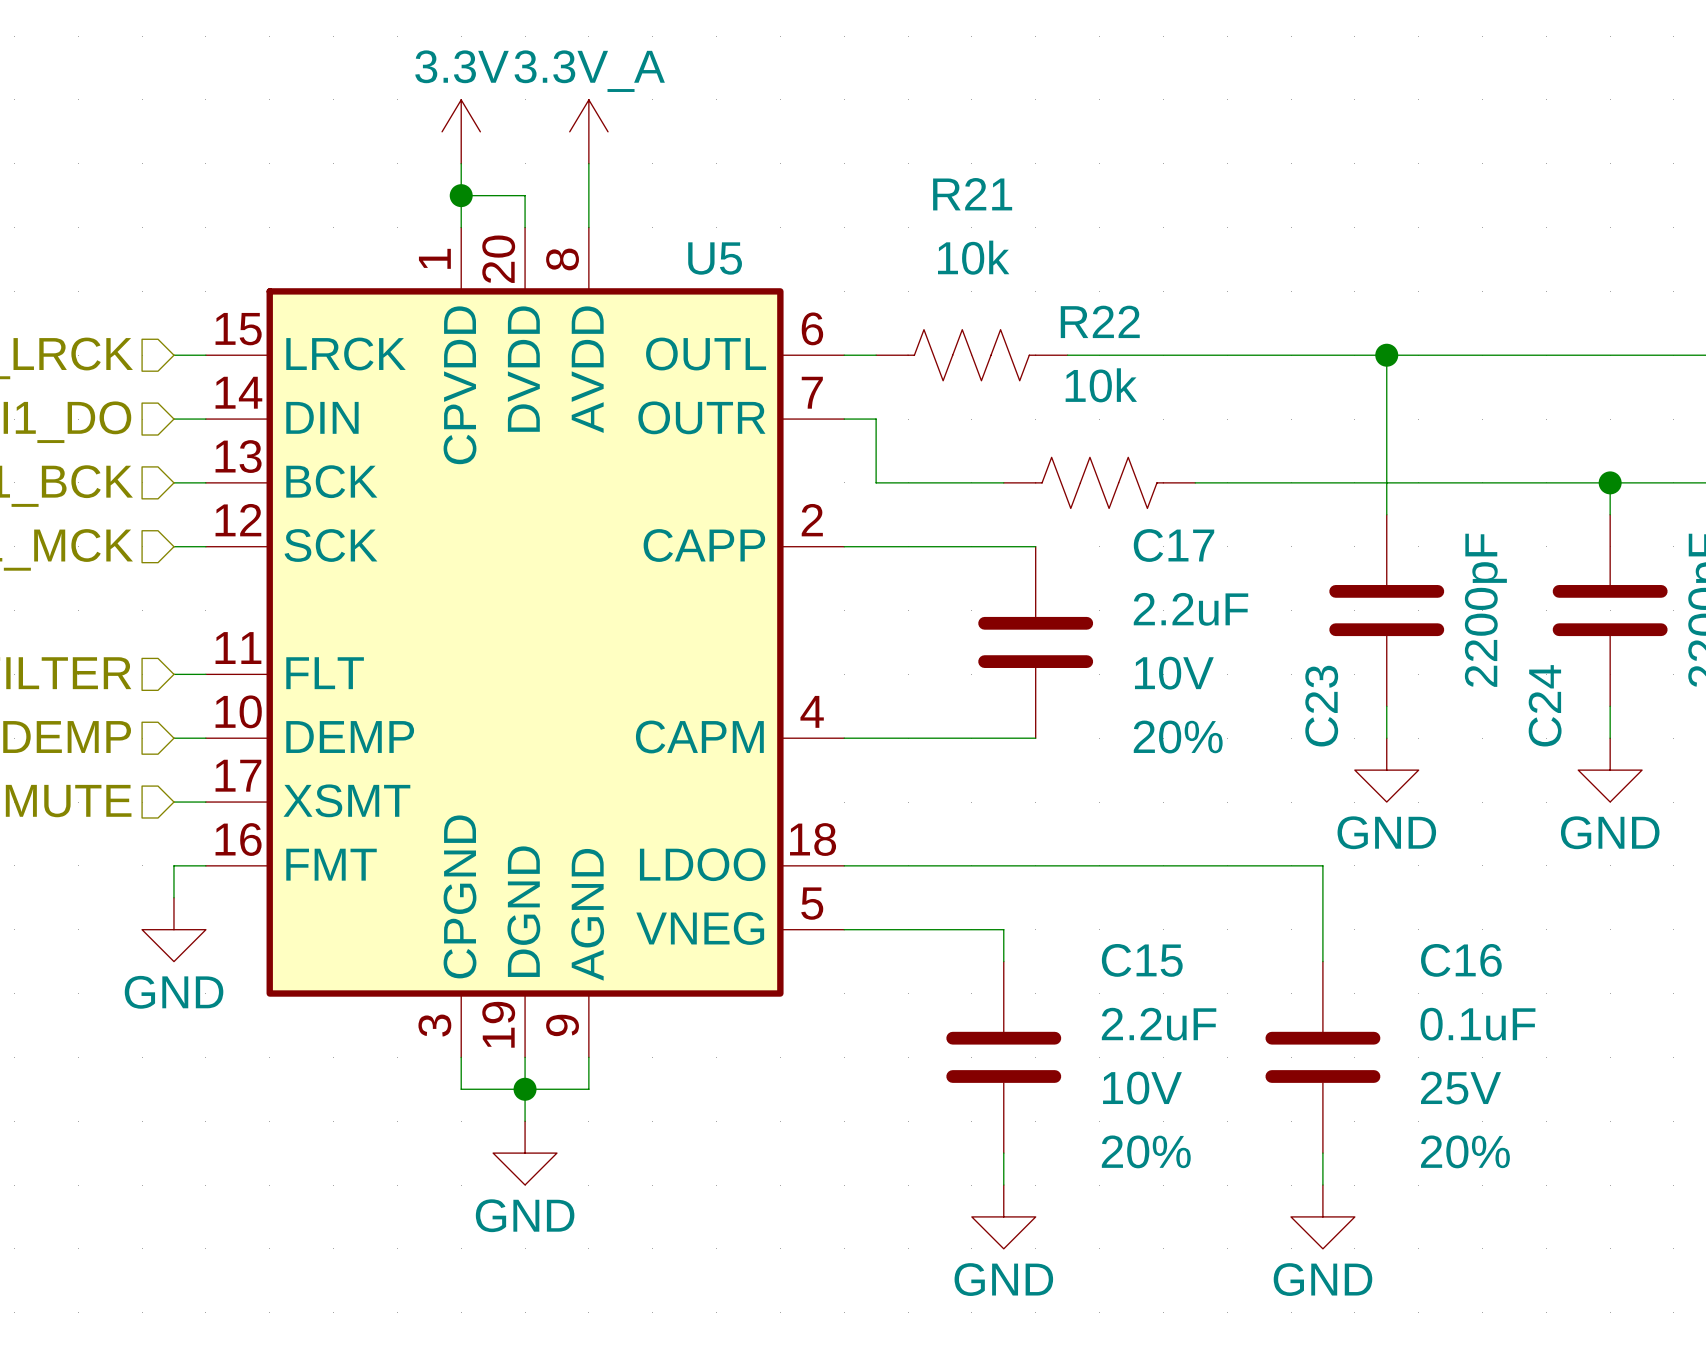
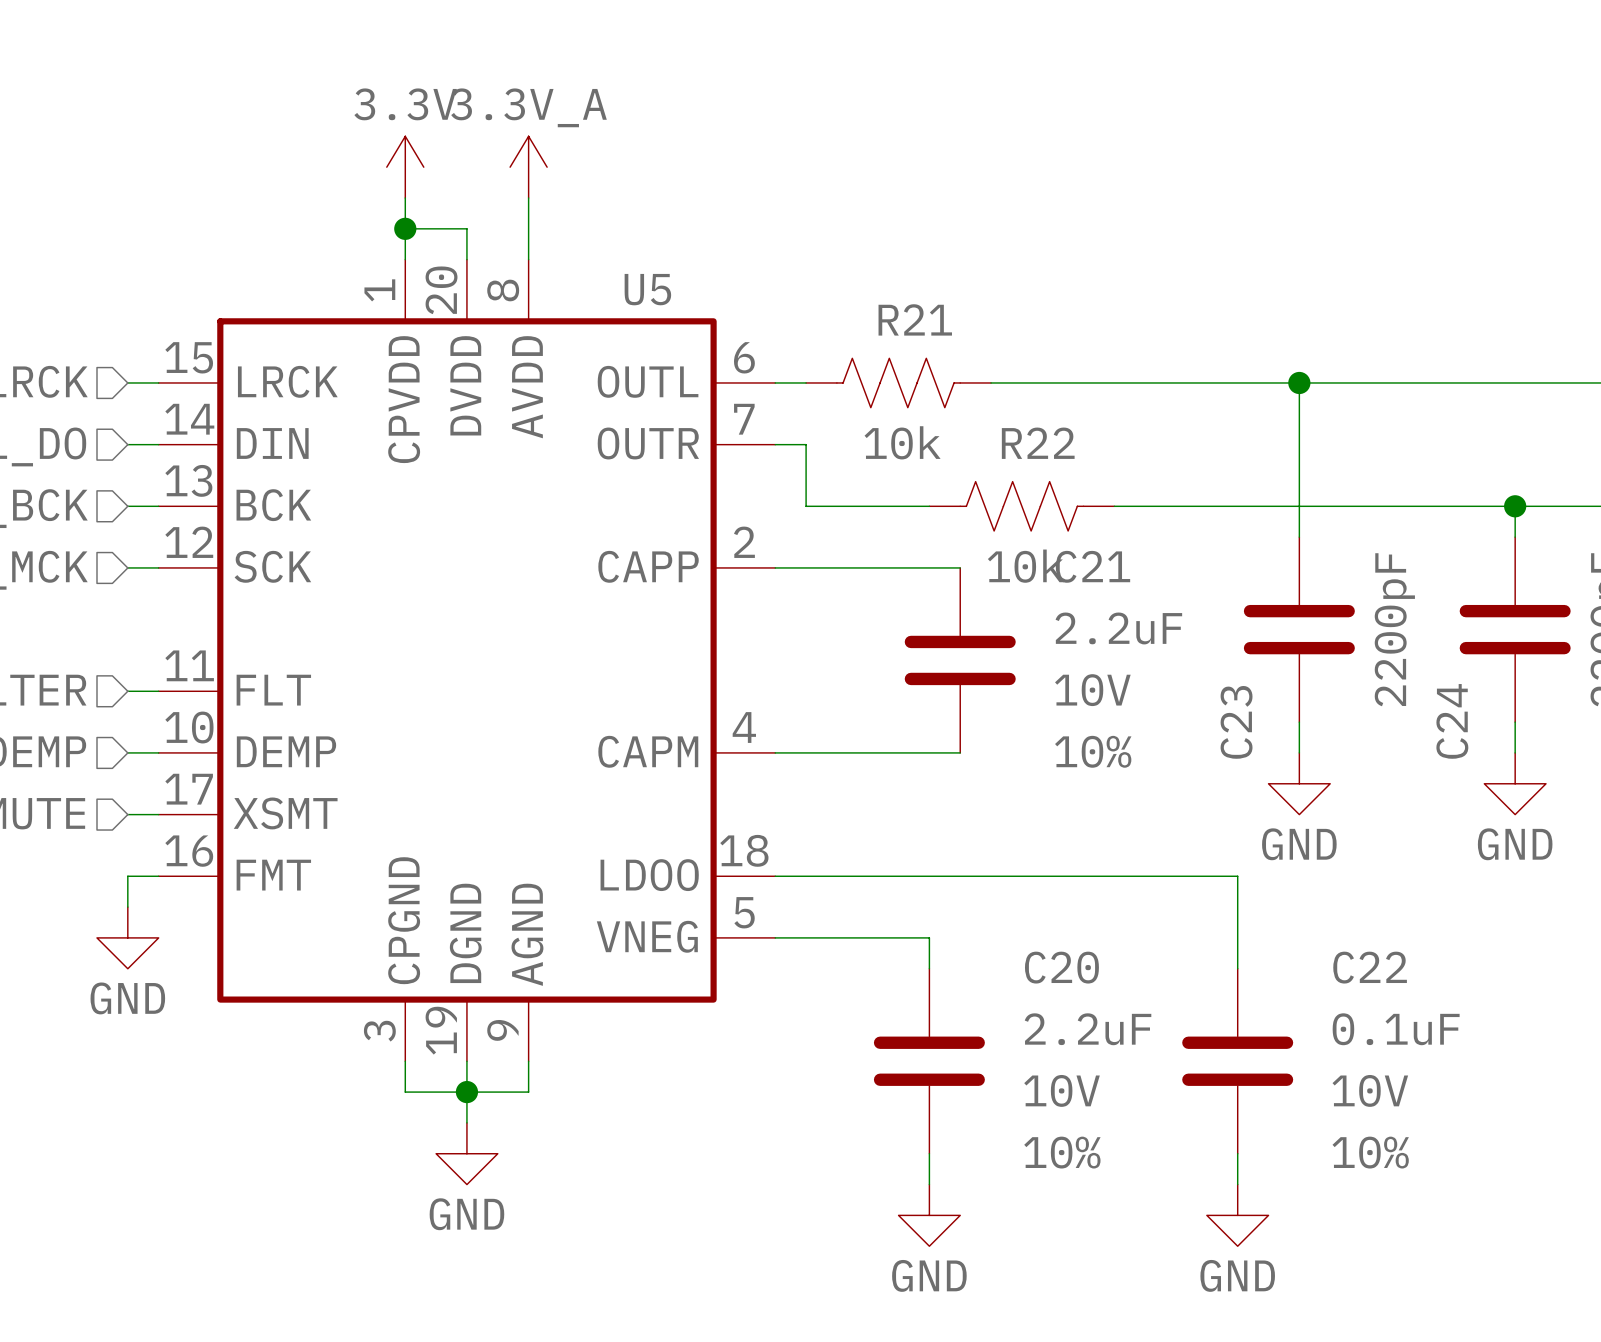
R21 name position: R21 (972, 194) -> R21 (915, 319)
R21 value position: 10k (973, 257) -> 10k (902, 442)
R22 name position: R22 (1100, 321) -> R22 (1038, 443)
R22 value position: 10k (1101, 385) -> 10k (1025, 566)
C17 name: C17 (1173, 545) -> C21 (1092, 566)
C17 text: 20% (1178, 736) -> 10% (1093, 751)
C15 name: C15 (1142, 960) -> C20 (1061, 967)
C16 name: C16 (1461, 960) -> C22 (1370, 967)
C16 text: 25V (1461, 1088) -> 10V (1370, 1090)
C15 text: 20% (1146, 1151) -> 10% (1062, 1152)
C16 text: 20% (1465, 1151) -> 10% (1370, 1152)

